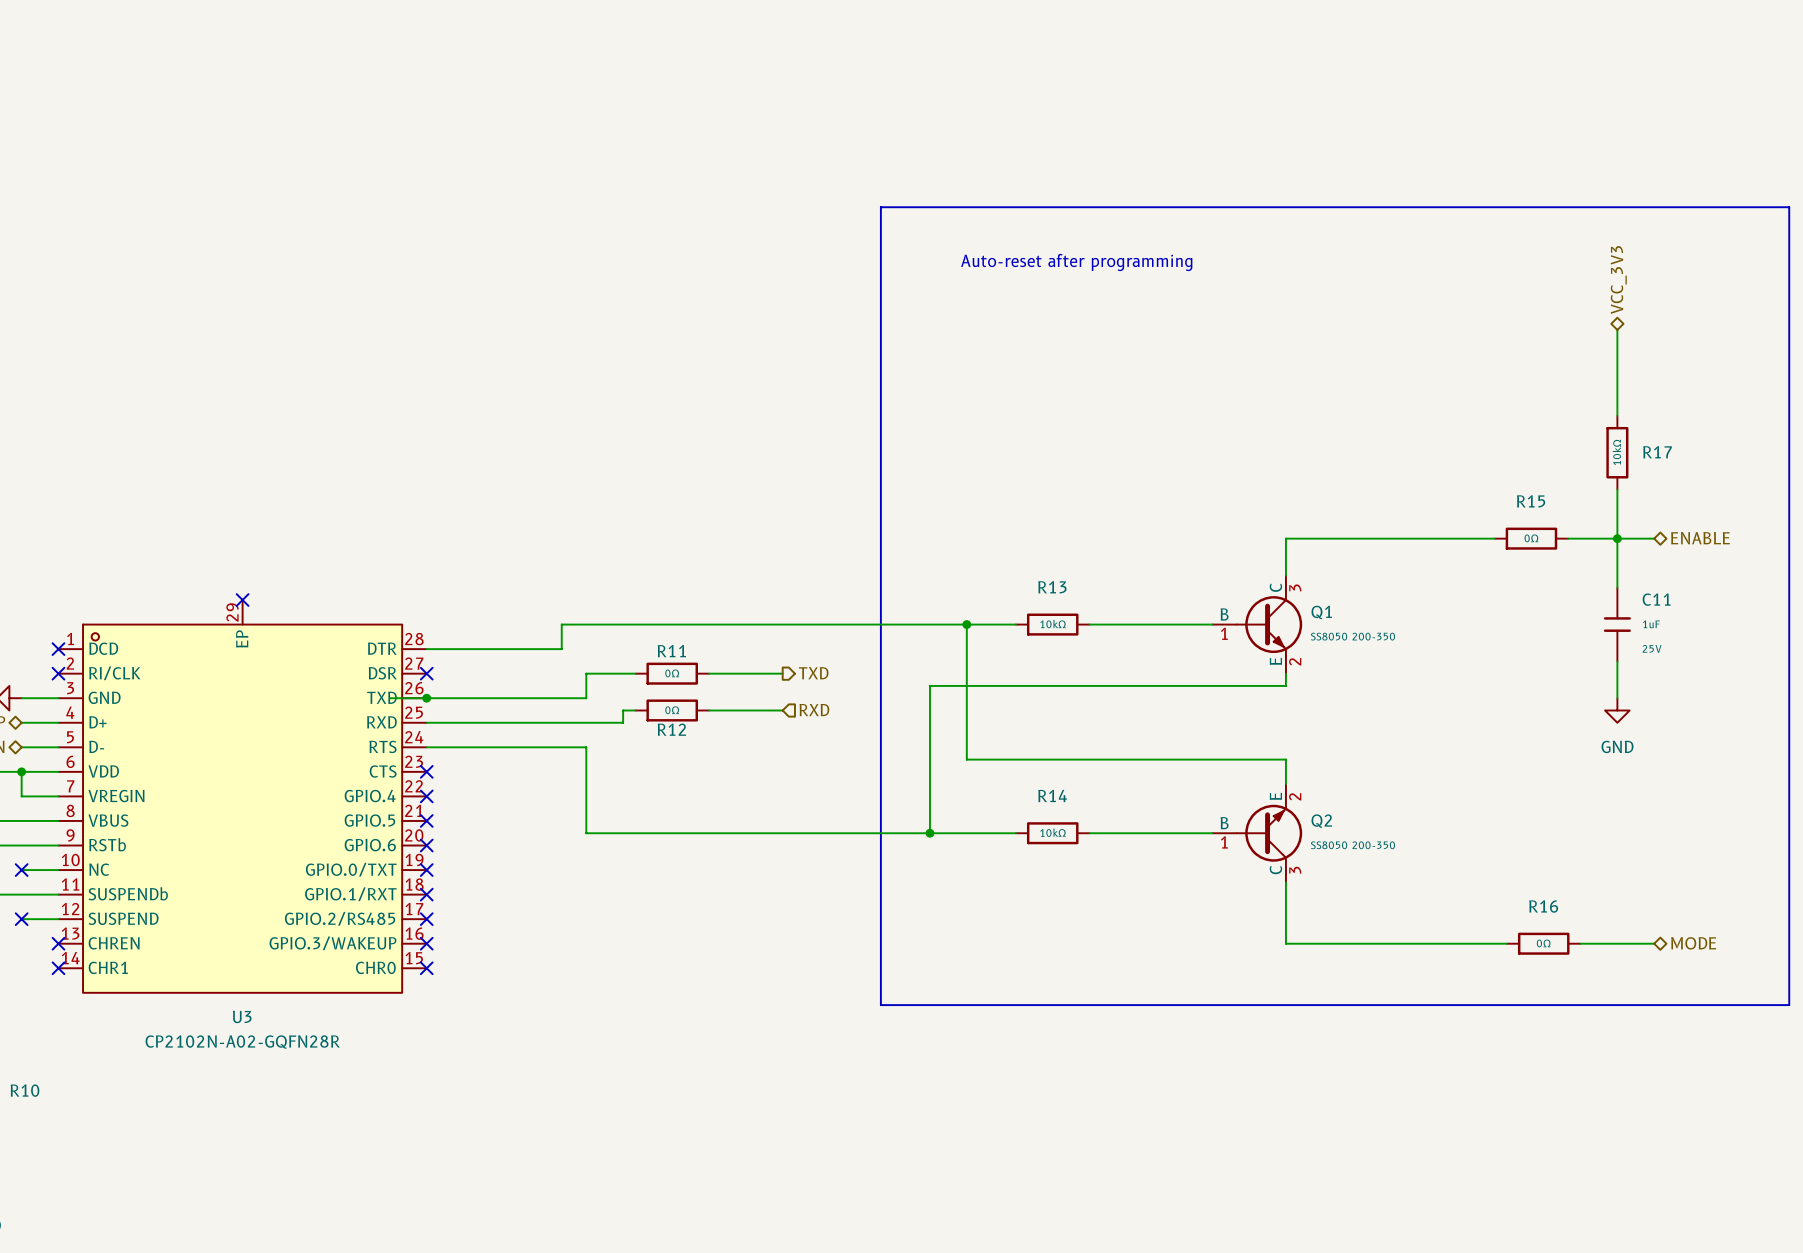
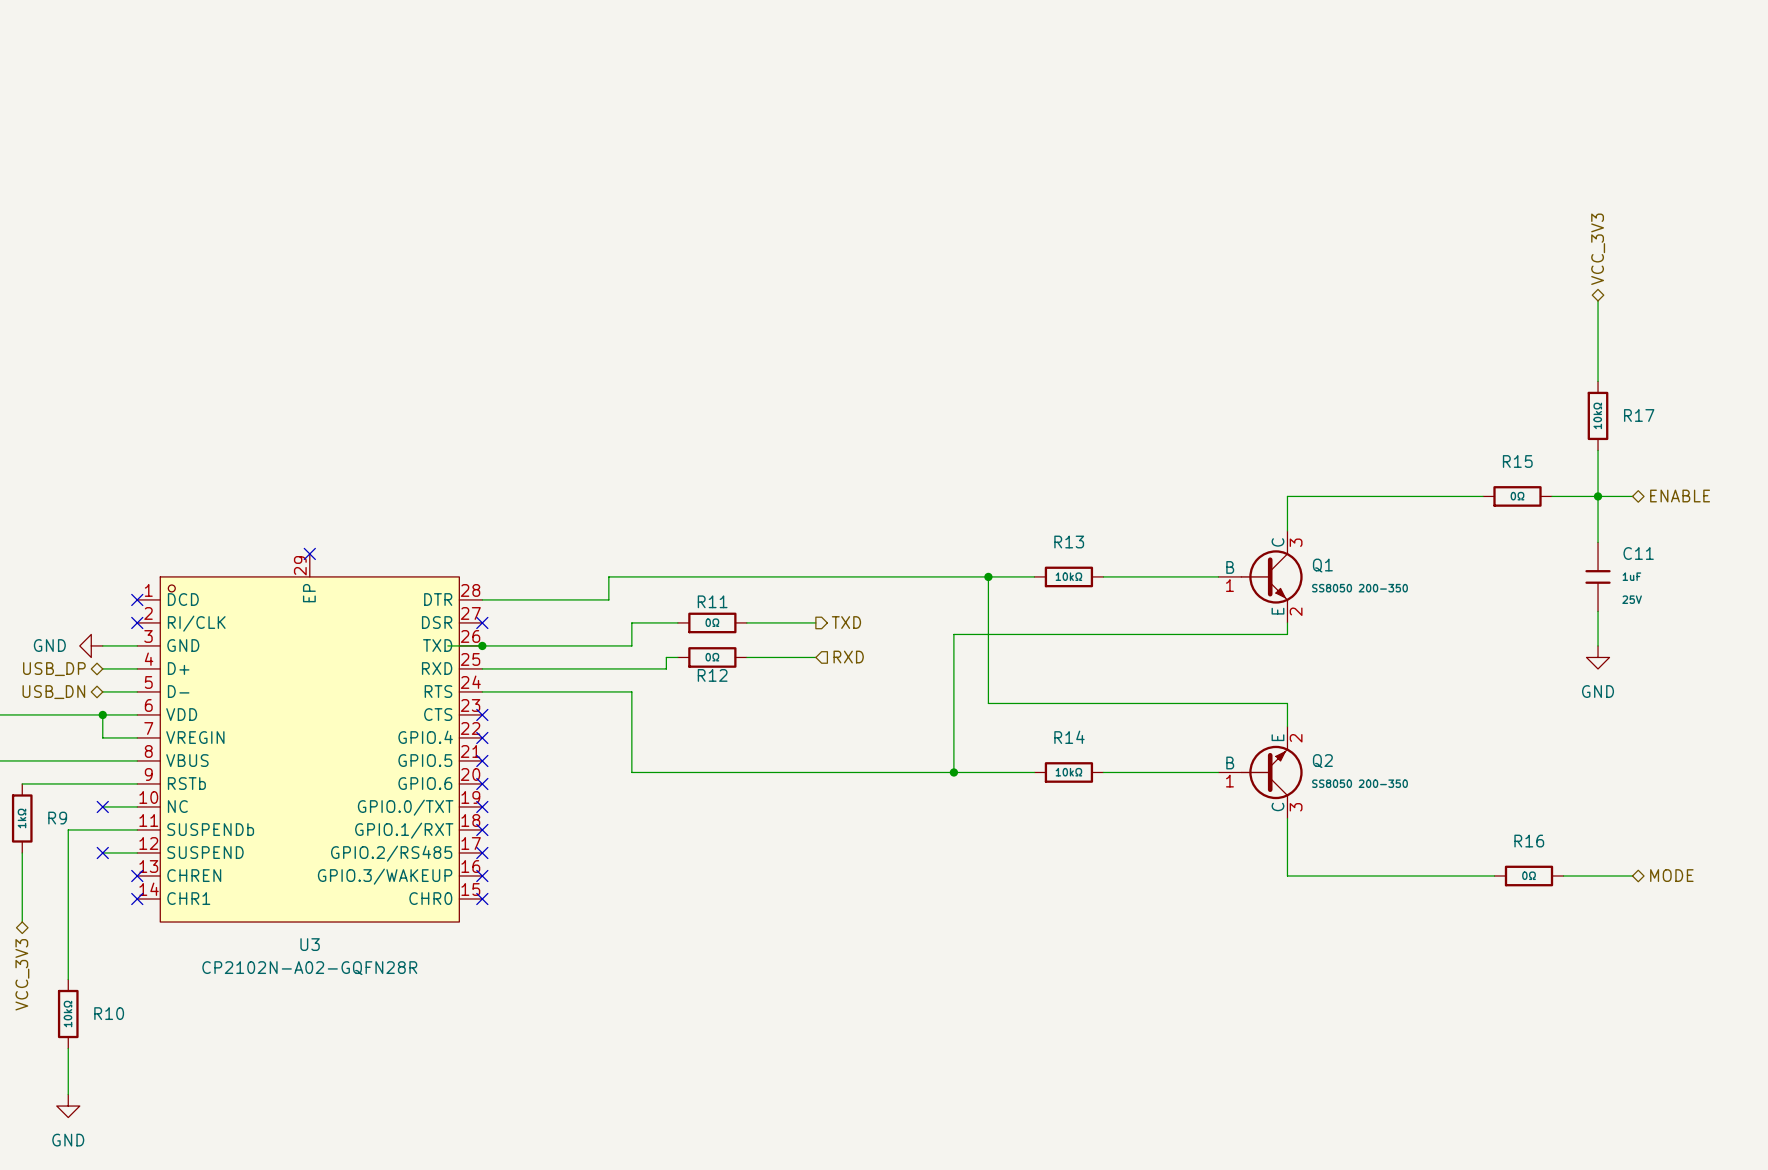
line: (880, 207) (1789, 207) (1789, 1005) (880, 1005) (880, 207) -> none
text: Auto-reset after programming (1076, 262) -> none

